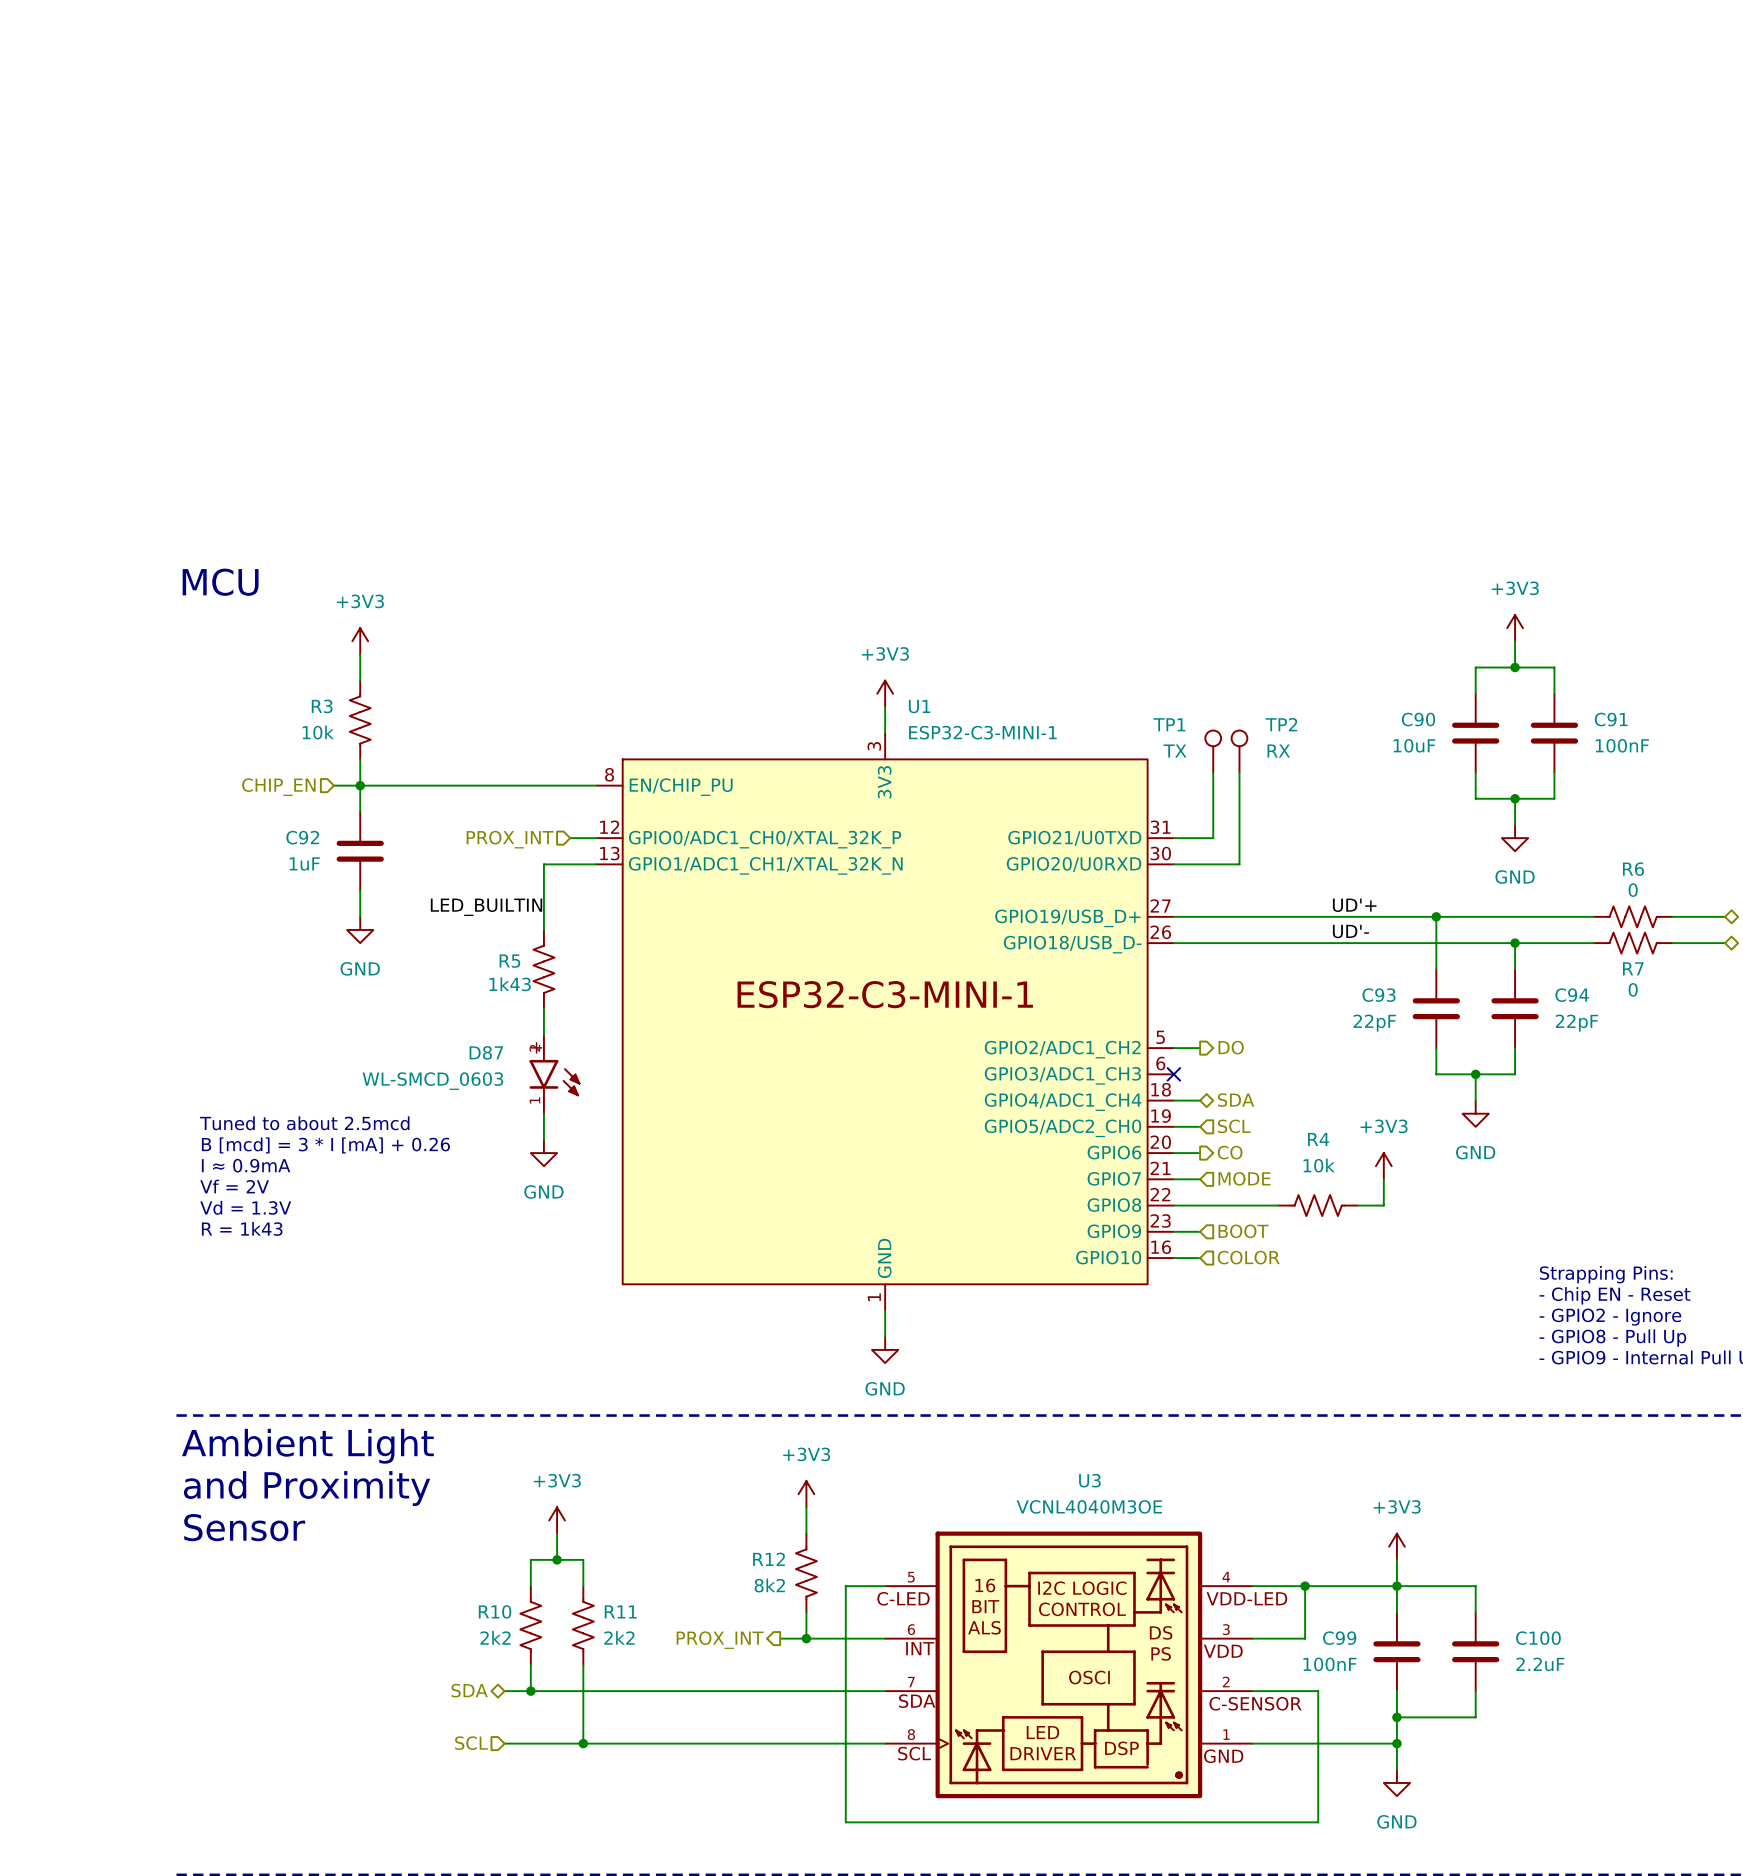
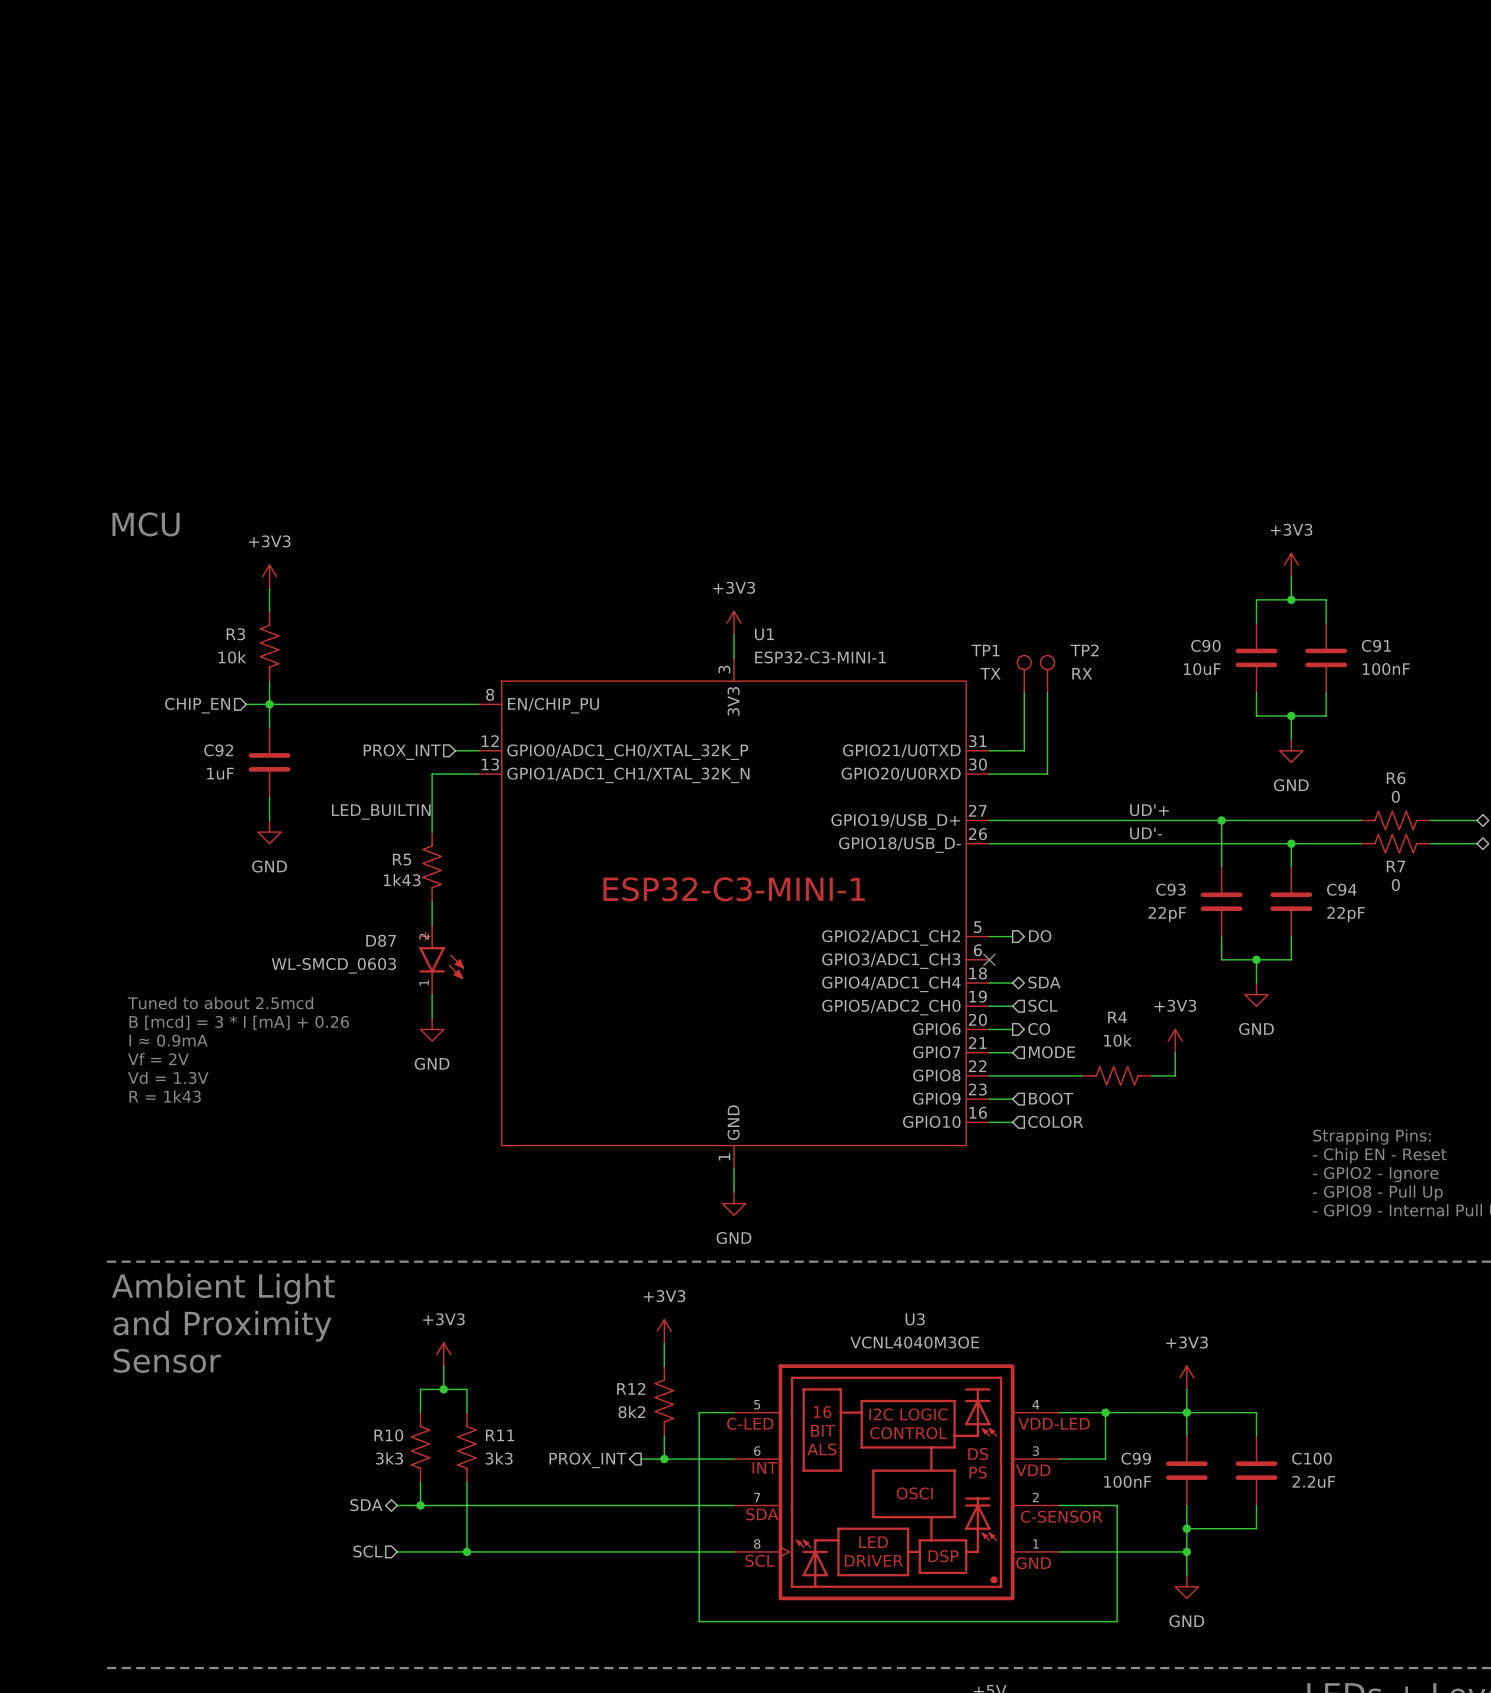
R10 value: 2k2 (495, 1637) -> 3k3 (389, 1458)
R11 value: 2k2 (619, 1637) -> 3k3 (499, 1458)

